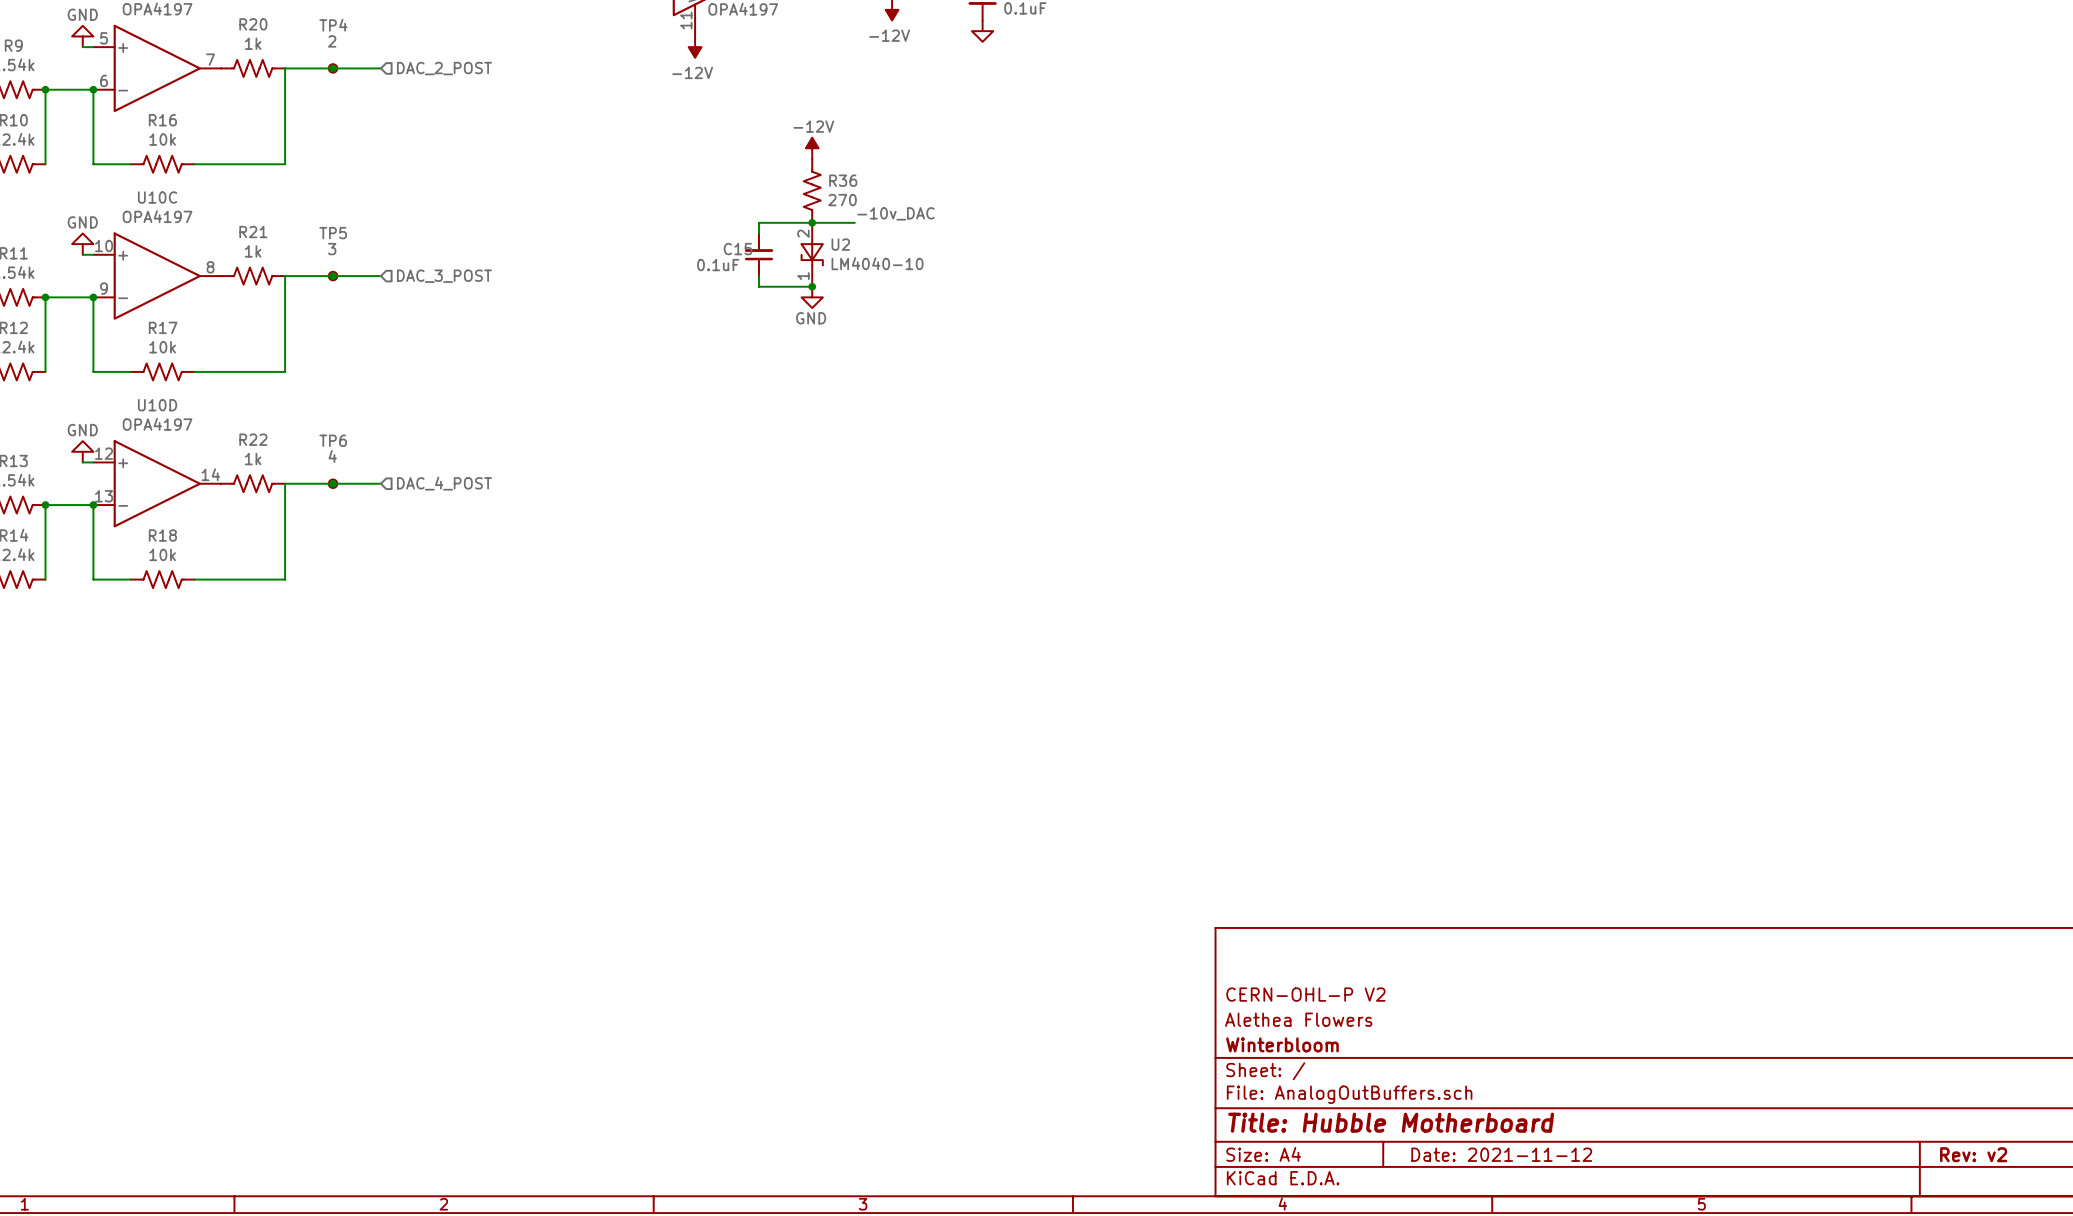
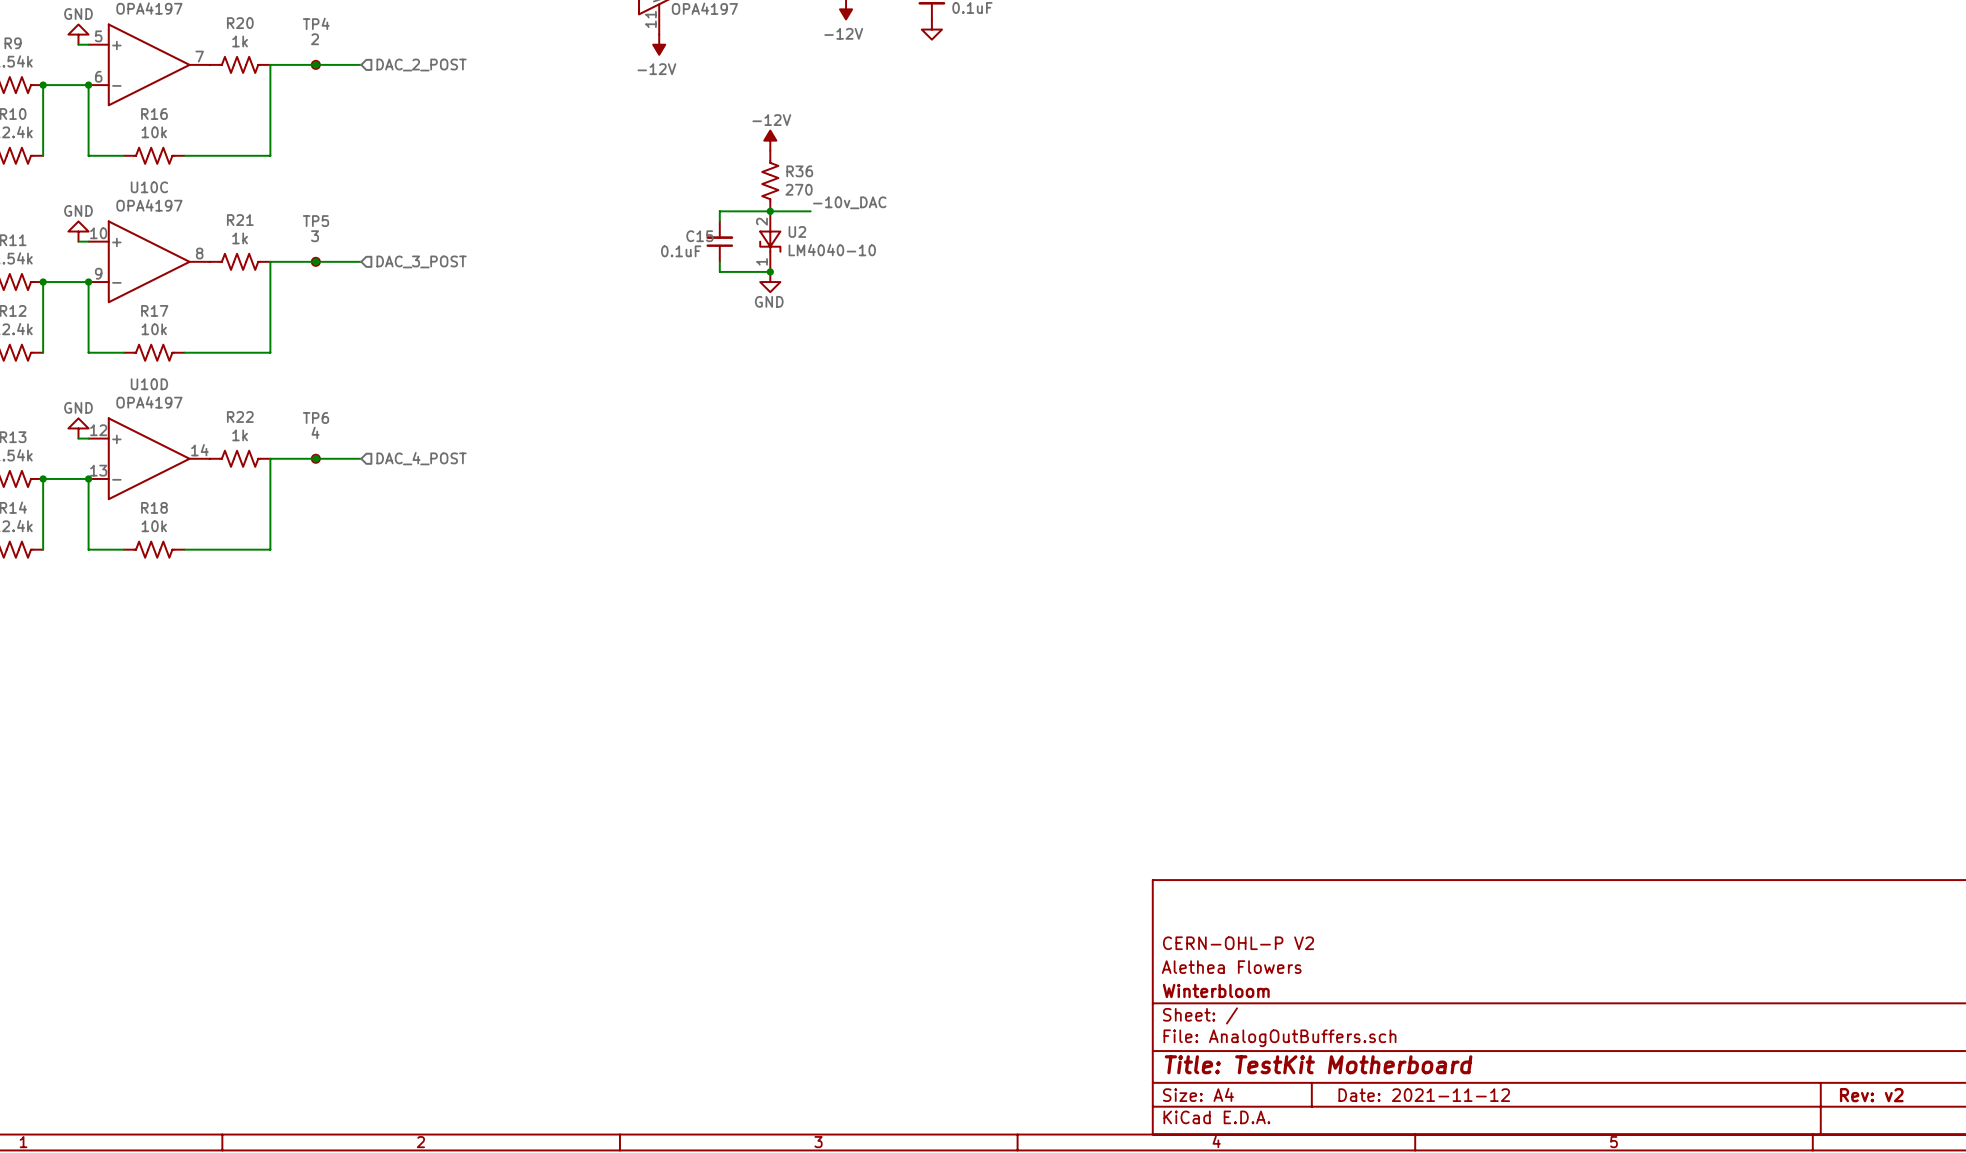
title block: Title: Hubble Motherboard (1391, 1122) -> Title: TestKit Motherboard (1318, 1064)

